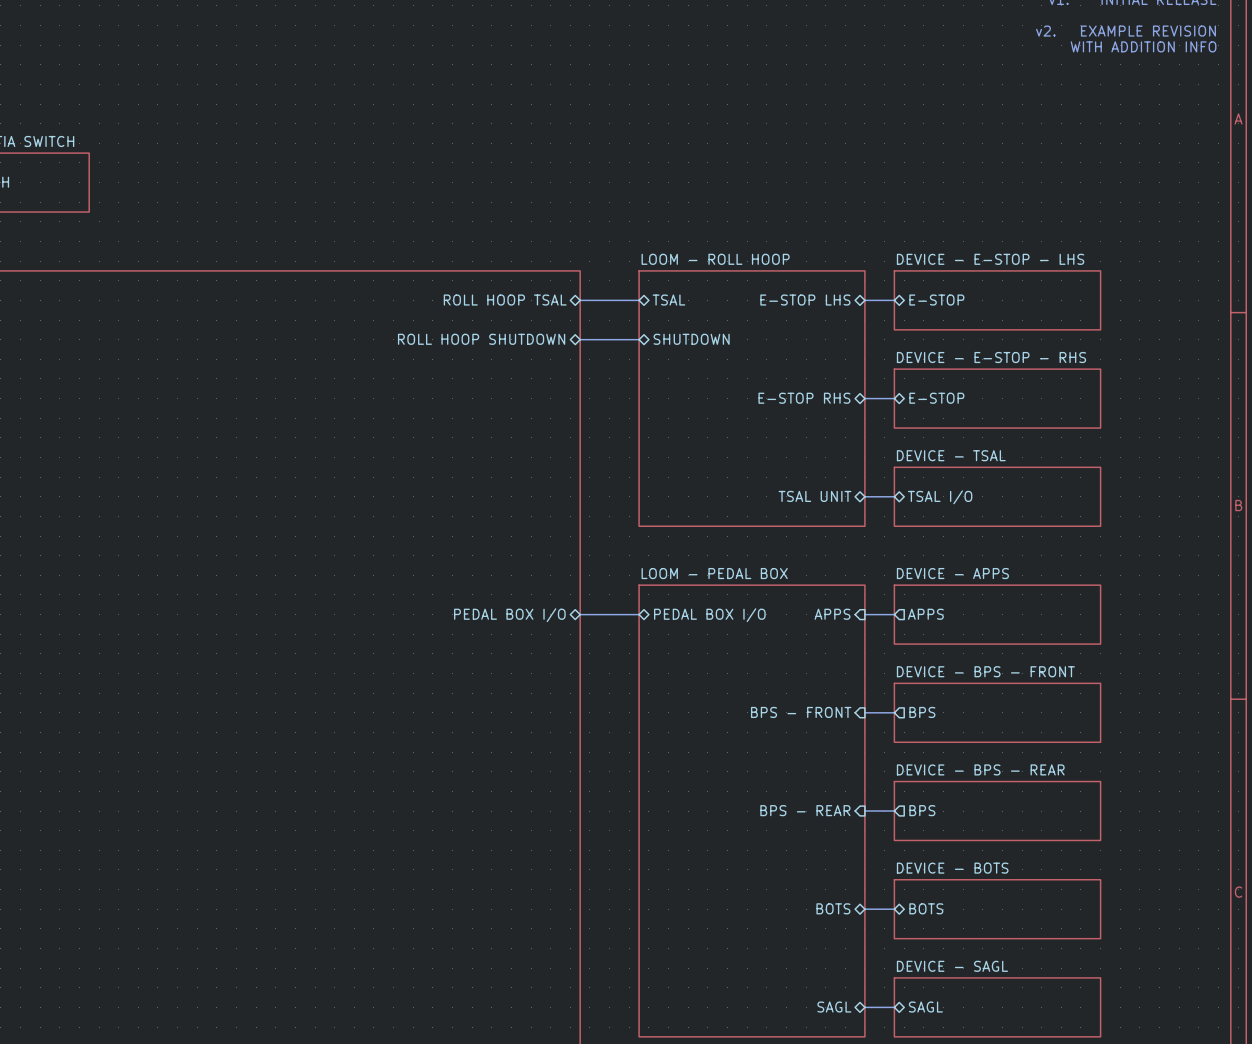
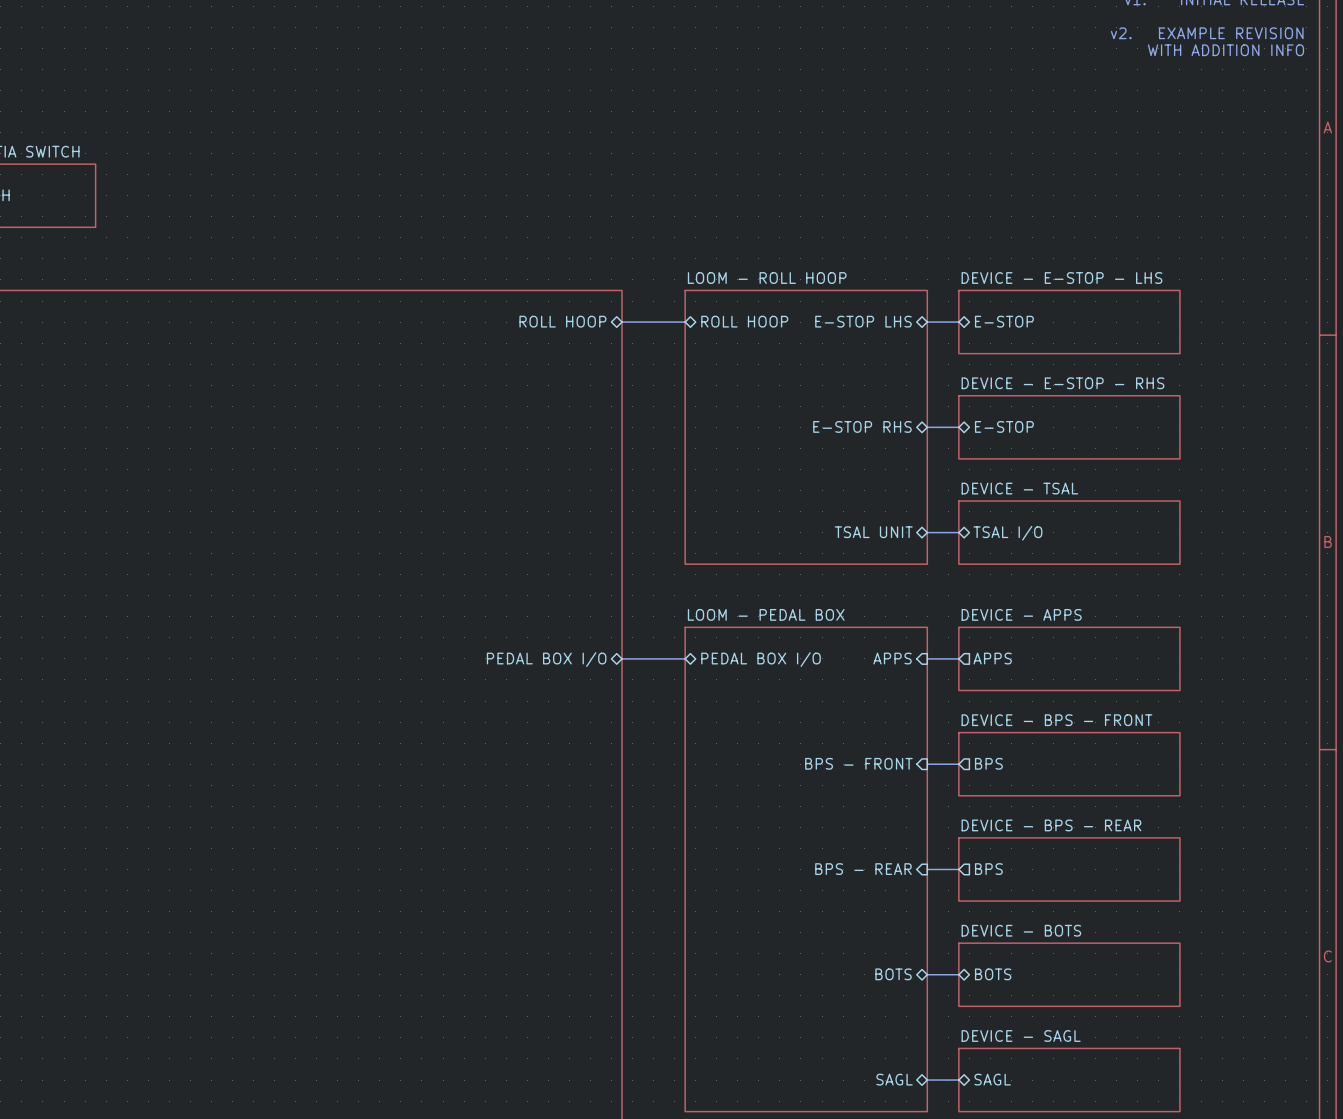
sheet pin: ROLL HOOP TSAL (505, 300) -> ROLL HOOP (562, 321)
sheet pin: TSAL (668, 300) -> ROLL HOOP (744, 321)
sheet pin: ROLL HOOP SHUTDOWN (481, 339) -> none
bus: (580, 339) (639, 339) -> none
sheet pin: SHUTDOWN (691, 339) -> none

